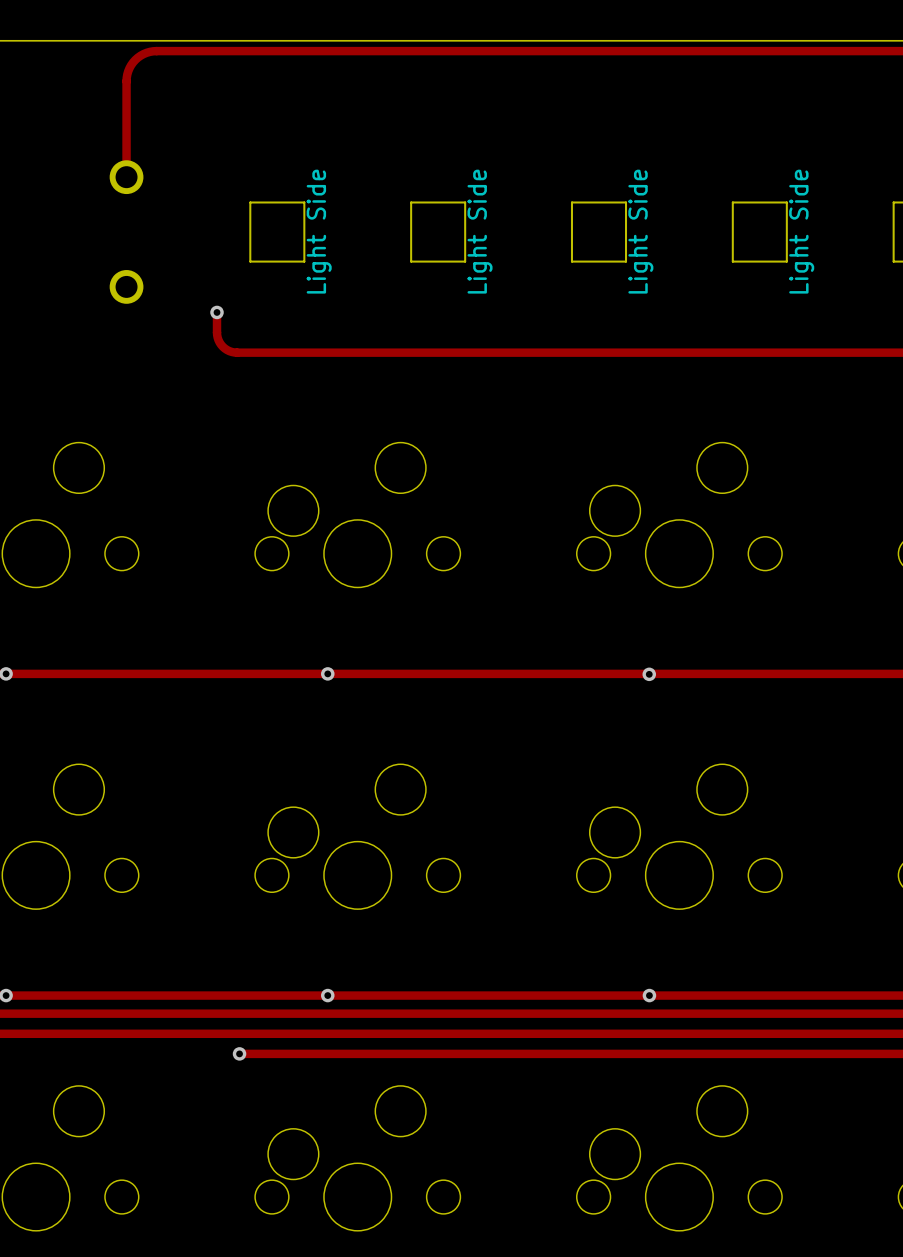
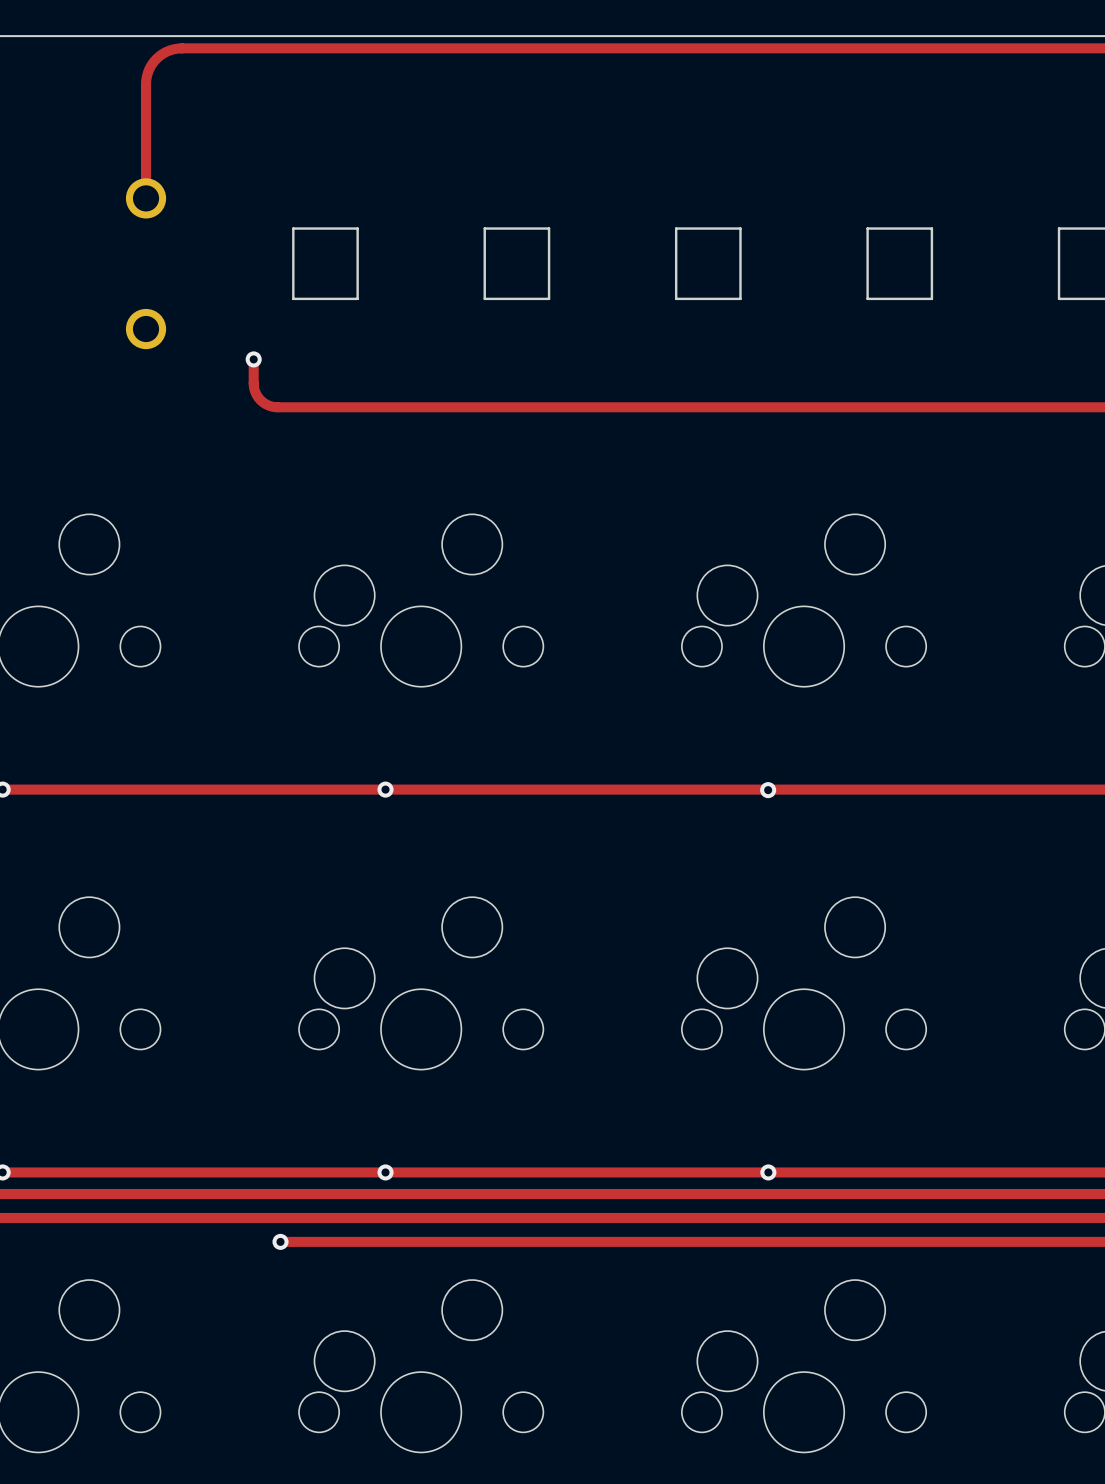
part text: Light Side (319, 231) -> none
part text: Light Side (480, 231) -> none
part text: Light Side (640, 231) -> none
part text: Light Side (801, 231) -> none

